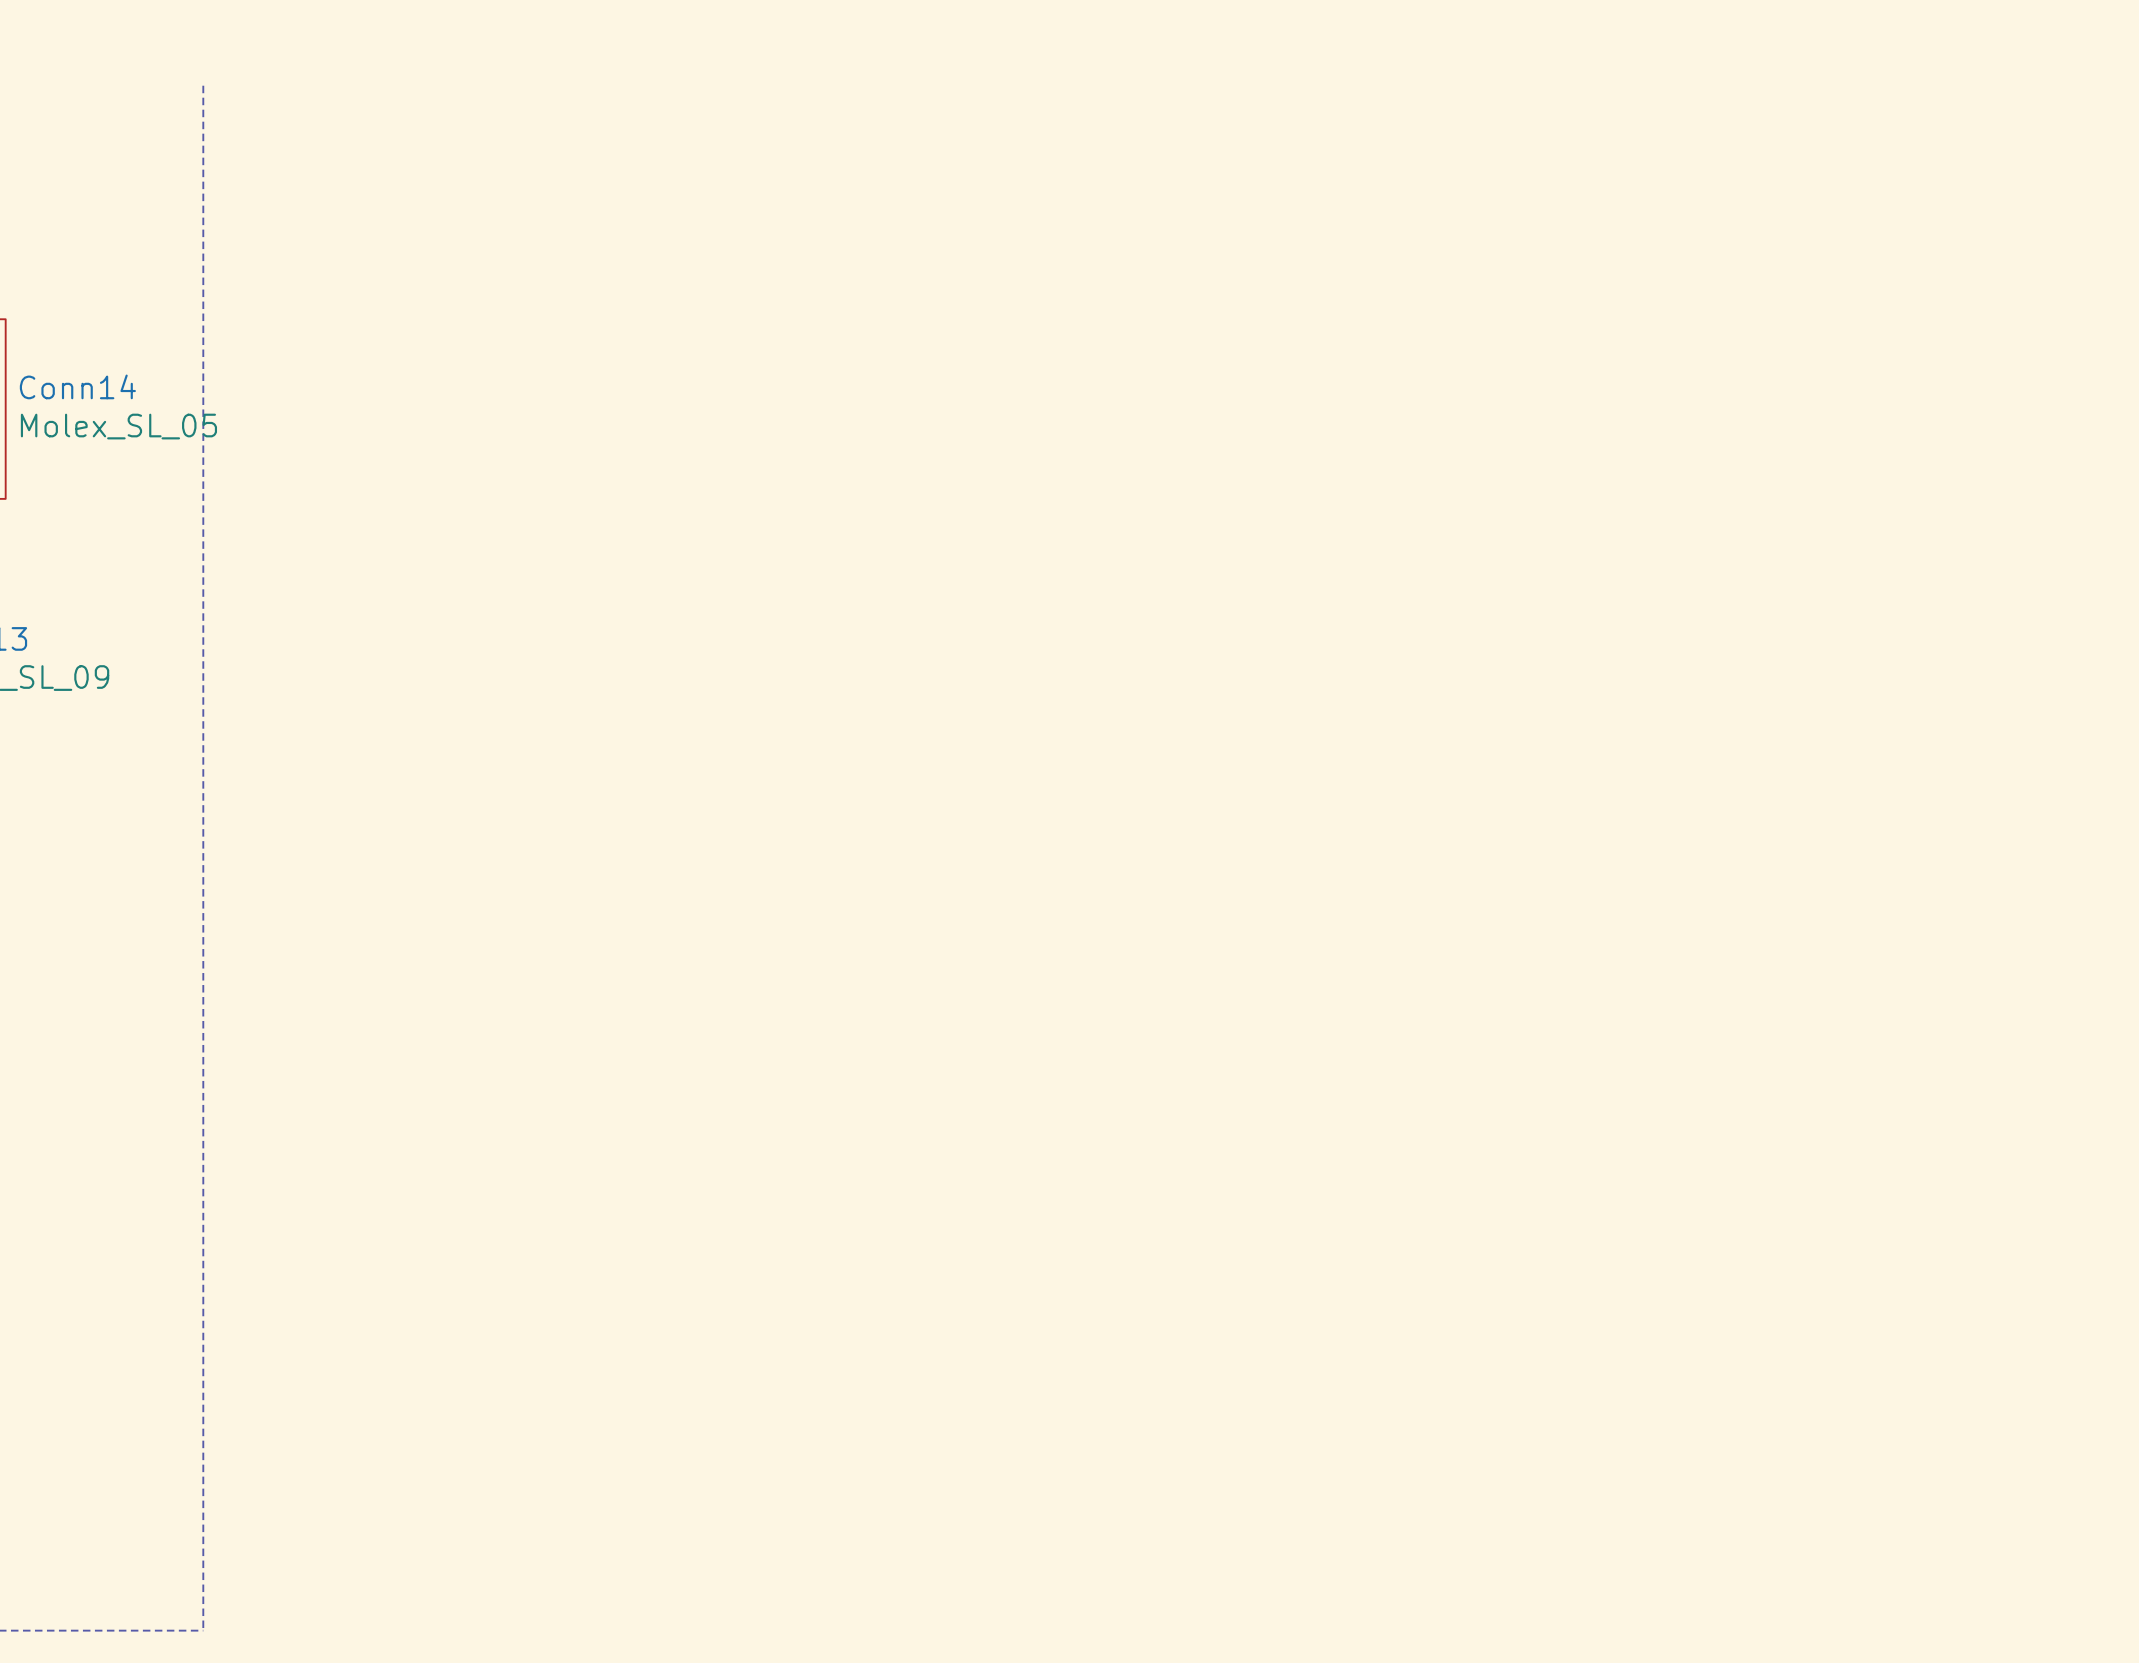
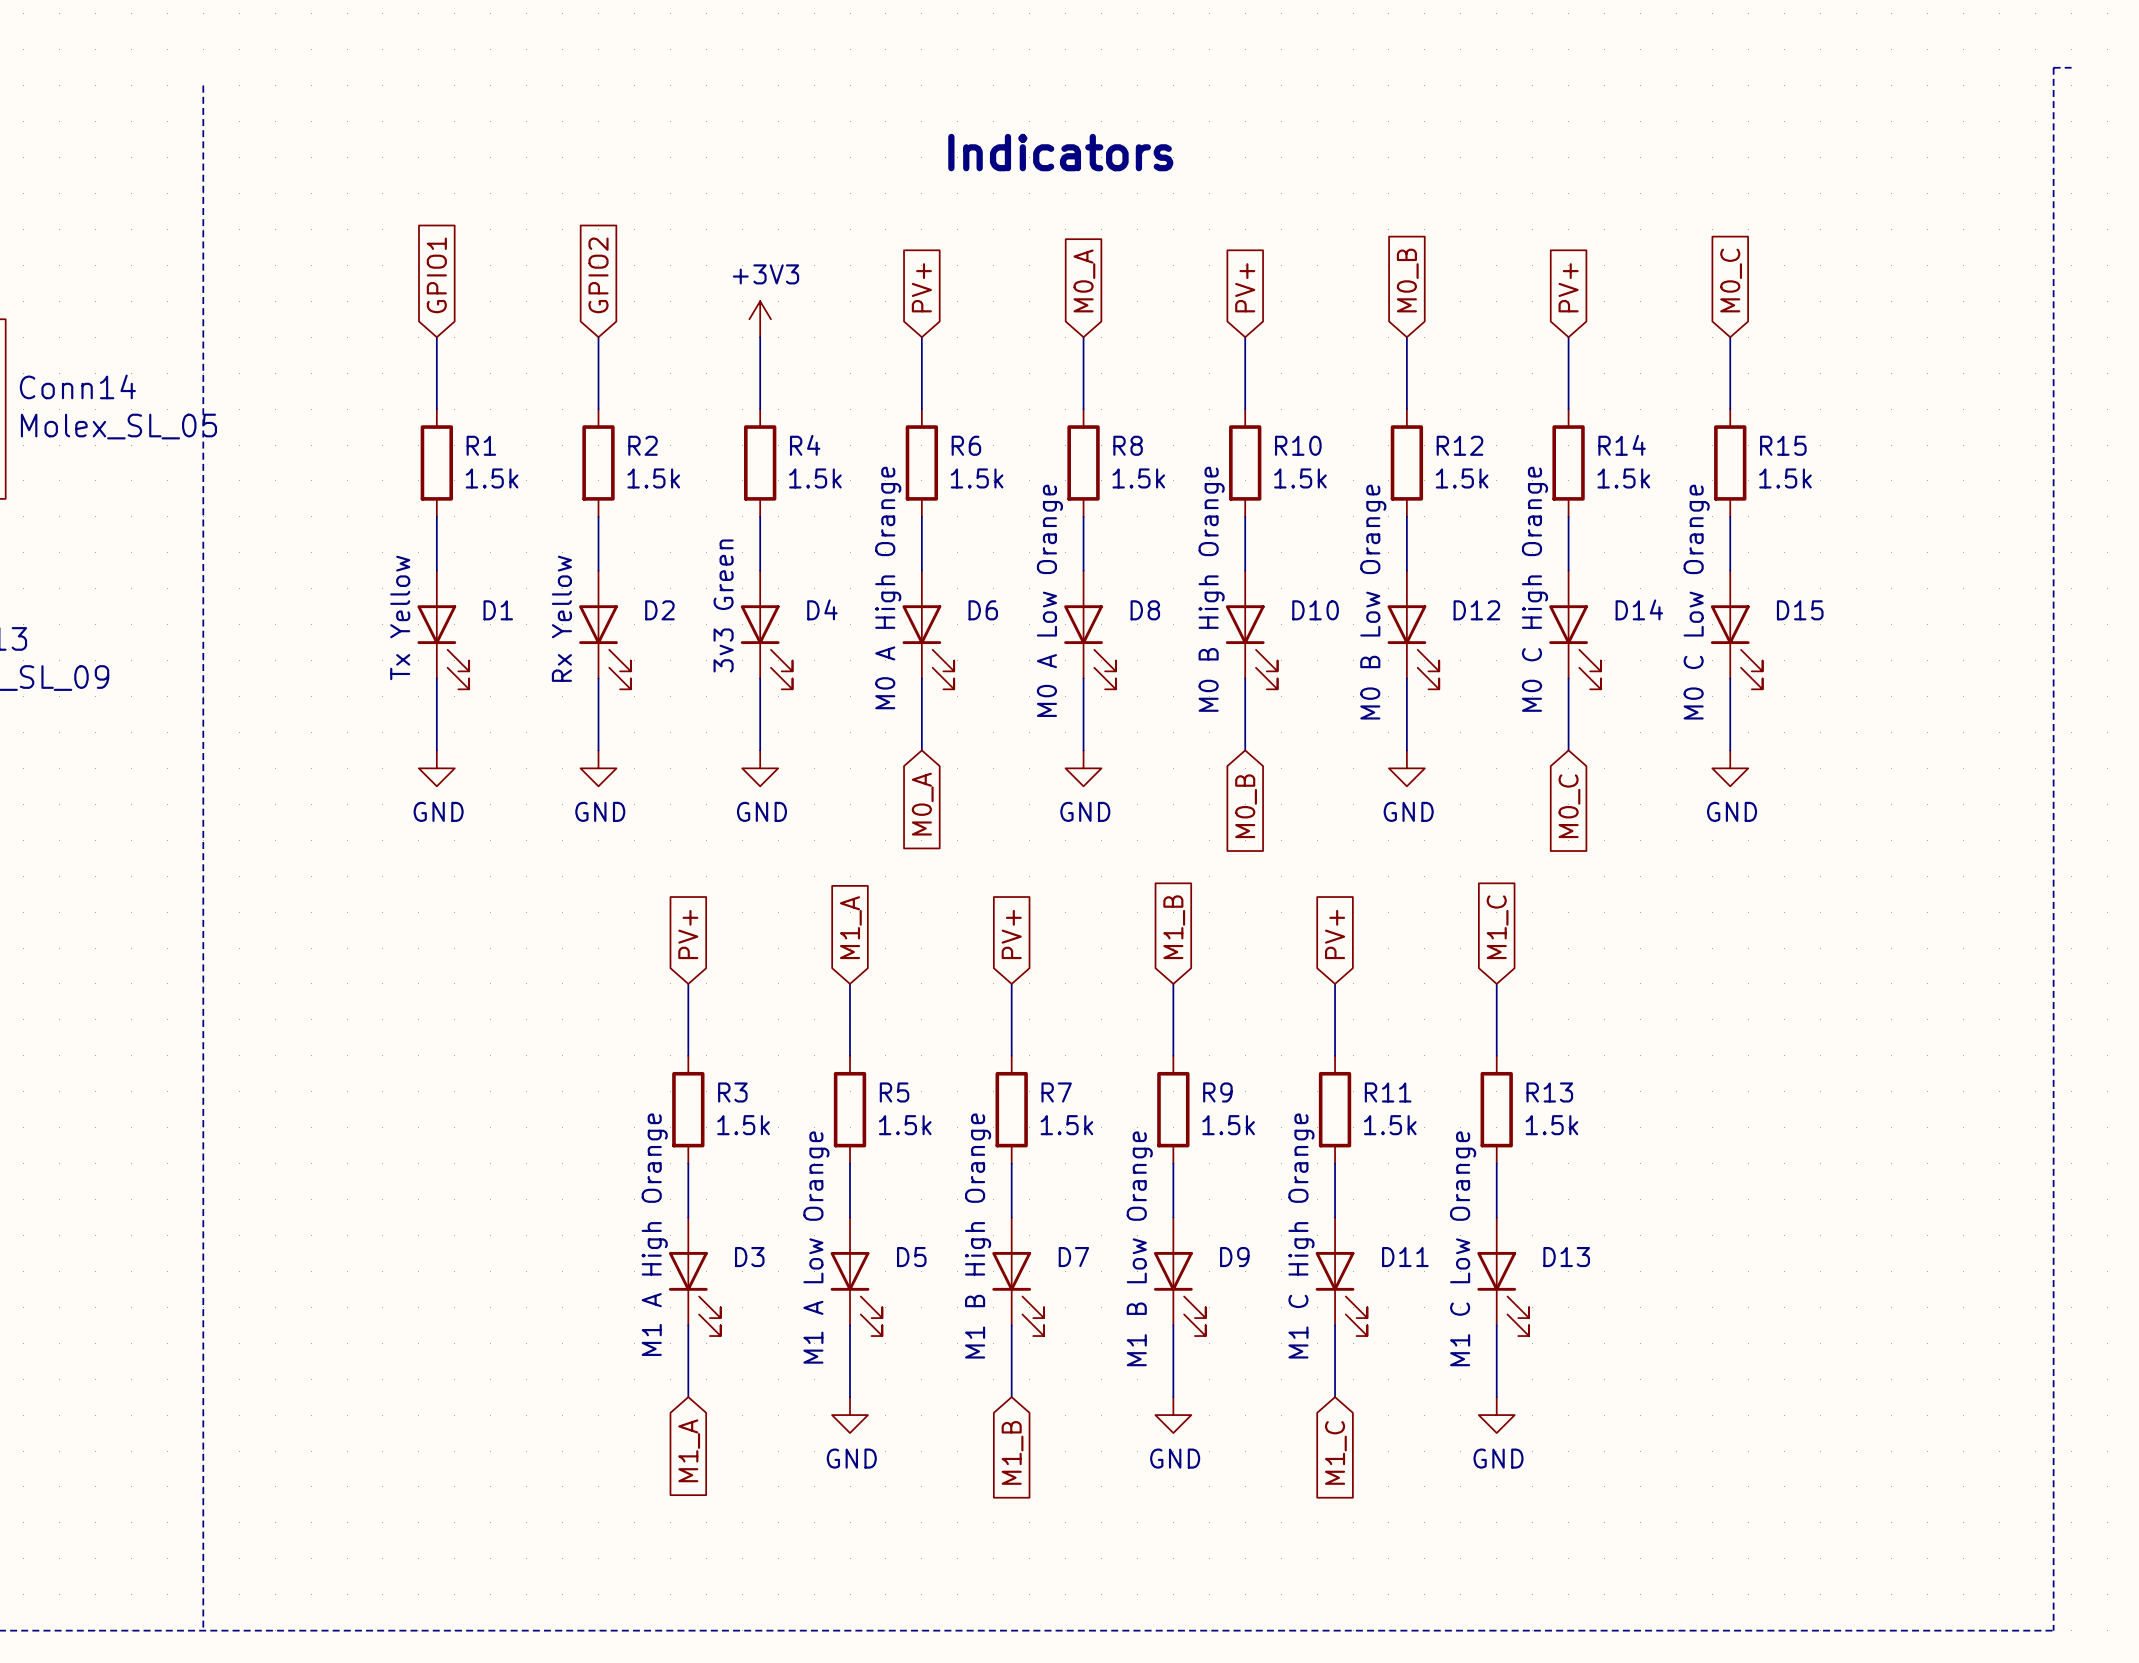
line: none -> (2071, 67) (2053, 67) (2053, 1630) (203, 1630)
text: none -> Indicators (1060, 152)
global label: none -> GPIO1 (436, 275)
global label: none -> GPIO2 (598, 275)
global label: none -> M0_A (1084, 280)
global label: none -> M0_B (1407, 280)
global label: none -> M0_C (1731, 280)
global label: none -> PV+ (921, 287)
global label: none -> PV+ (1245, 287)
global label: none -> PV+ (1568, 287)
power symbol: none -> +3V3 (760, 319)
wire: none -> (436, 337) (436, 409)
wire: none -> (598, 337) (598, 409)
wire: none -> (760, 337) (760, 409)
wire: none -> (921, 337) (921, 409)
wire: none -> (1083, 337) (1083, 409)
wire: none -> (1245, 337) (1245, 409)
wire: none -> (1406, 337) (1406, 409)
wire: none -> (1568, 337) (1568, 409)
wire: none -> (1730, 337) (1730, 409)
R1: none -> 1.5k (436, 462)
R2: none -> 1.5k (598, 462)
R4: none -> 1.5k (760, 462)
R6: none -> 1.5k (921, 462)
R8: none -> 1.5k (1083, 462)
R10: none -> 1.5k (1245, 462)
R12: none -> 1.5k (1406, 462)
R14: none -> 1.5k (1568, 462)
R15: none -> 1.5k (1730, 462)
wire: none -> (436, 516) (436, 570)
wire: none -> (598, 516) (598, 570)
wire: none -> (760, 516) (760, 570)
wire: none -> (921, 516) (921, 570)
wire: none -> (1083, 516) (1083, 570)
wire: none -> (1245, 516) (1245, 570)
wire: none -> (1406, 516) (1406, 570)
wire: none -> (1568, 516) (1568, 570)
wire: none -> (1730, 516) (1730, 570)
D1: none -> Tx Yellow (443, 630)
D2: none -> Rx Yellow (604, 630)
D4: none -> 3v3 Green (766, 630)
D6: none -> M0 A High Orange (928, 630)
D8: none -> M0 A Low Orange (1090, 630)
D10: none -> M0 B High Orange (1251, 630)
D12: none -> M0 B Low Orange (1413, 630)
D14: none -> M0 C High Orange (1575, 630)
D15: none -> M0 C Low Orange (1736, 630)
wire: none -> (436, 678) (436, 750)
wire: none -> (598, 678) (598, 750)
wire: none -> (760, 678) (760, 750)
wire: none -> (921, 678) (921, 750)
wire: none -> (1083, 678) (1083, 750)
wire: none -> (1245, 678) (1245, 750)
wire: none -> (1406, 678) (1406, 750)
wire: none -> (1568, 678) (1568, 750)
wire: none -> (1730, 678) (1730, 750)
power symbol: none -> GND (436, 768)
power symbol: none -> GND (598, 768)
power symbol: none -> GND (760, 768)
power symbol: none -> GND (1083, 768)
power symbol: none -> GND (1406, 768)
power symbol: none -> GND (1730, 768)
global label: none -> M0_A (922, 804)
global label: none -> M0_B (1246, 806)
global label: none -> M0_C (1569, 806)
global label: none -> M1_A (850, 927)
global label: none -> M1_B (1174, 927)
global label: none -> M1_C (1497, 927)
global label: none -> PV+ (688, 934)
global label: none -> PV+ (1011, 934)
global label: none -> PV+ (1335, 934)
wire: none -> (688, 983) (688, 1055)
wire: none -> (850, 983) (850, 1055)
wire: none -> (1011, 983) (1011, 1055)
wire: none -> (1173, 983) (1173, 1055)
wire: none -> (1335, 983) (1335, 1055)
wire: none -> (1496, 983) (1496, 1055)
R3: none -> 1.5k (688, 1109)
R5: none -> 1.5k (850, 1109)
R7: none -> 1.5k (1011, 1109)
R9: none -> 1.5k (1173, 1109)
R11: none -> 1.5k (1335, 1109)
R13: none -> 1.5k (1496, 1109)
wire: none -> (688, 1163) (688, 1217)
wire: none -> (850, 1163) (850, 1217)
wire: none -> (1011, 1163) (1011, 1217)
wire: none -> (1173, 1163) (1173, 1217)
wire: none -> (1335, 1163) (1335, 1217)
wire: none -> (1496, 1163) (1496, 1217)
D3: none -> M1 A High Orange (694, 1276)
D5: none -> M1 A Low Orange (856, 1276)
D7: none -> M1 B High Orange (1018, 1276)
D9: none -> M1 B Low Orange (1179, 1276)
D11: none -> M1 C High Orange (1341, 1276)
D13: none -> M1 C Low Orange (1503, 1276)
wire: none -> (688, 1325) (688, 1397)
wire: none -> (850, 1325) (850, 1397)
wire: none -> (1011, 1325) (1011, 1397)
wire: none -> (1173, 1325) (1173, 1397)
wire: none -> (1335, 1325) (1335, 1397)
wire: none -> (1496, 1325) (1496, 1397)
power symbol: none -> GND (850, 1415)
power symbol: none -> GND (1173, 1415)
power symbol: none -> GND (1496, 1415)
global label: none -> M1_A (689, 1450)
global label: none -> M1_B (1012, 1452)
global label: none -> M1_C (1335, 1452)

